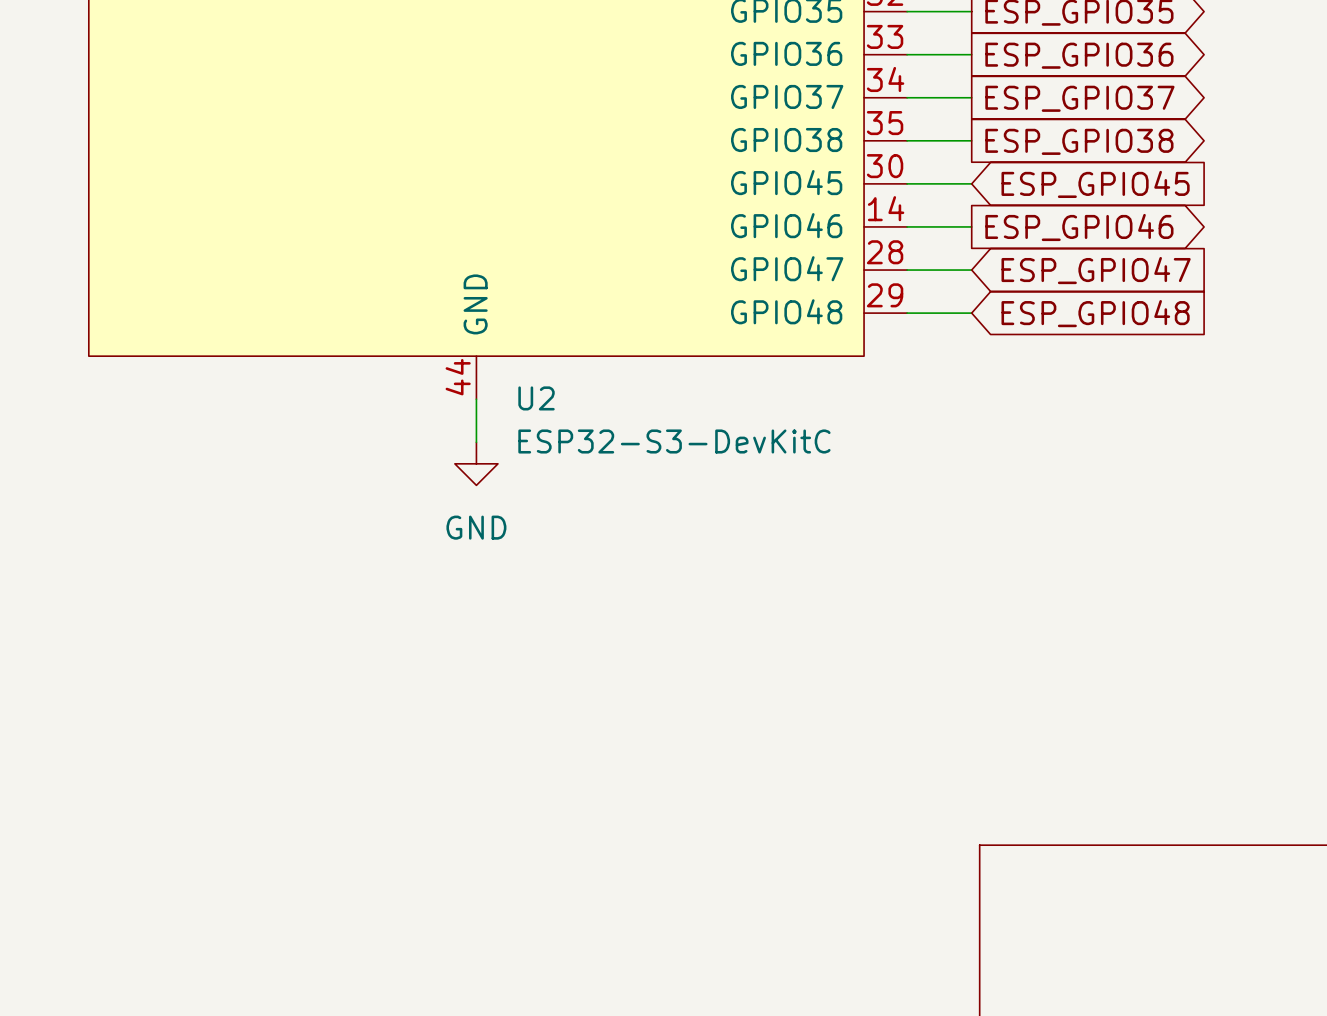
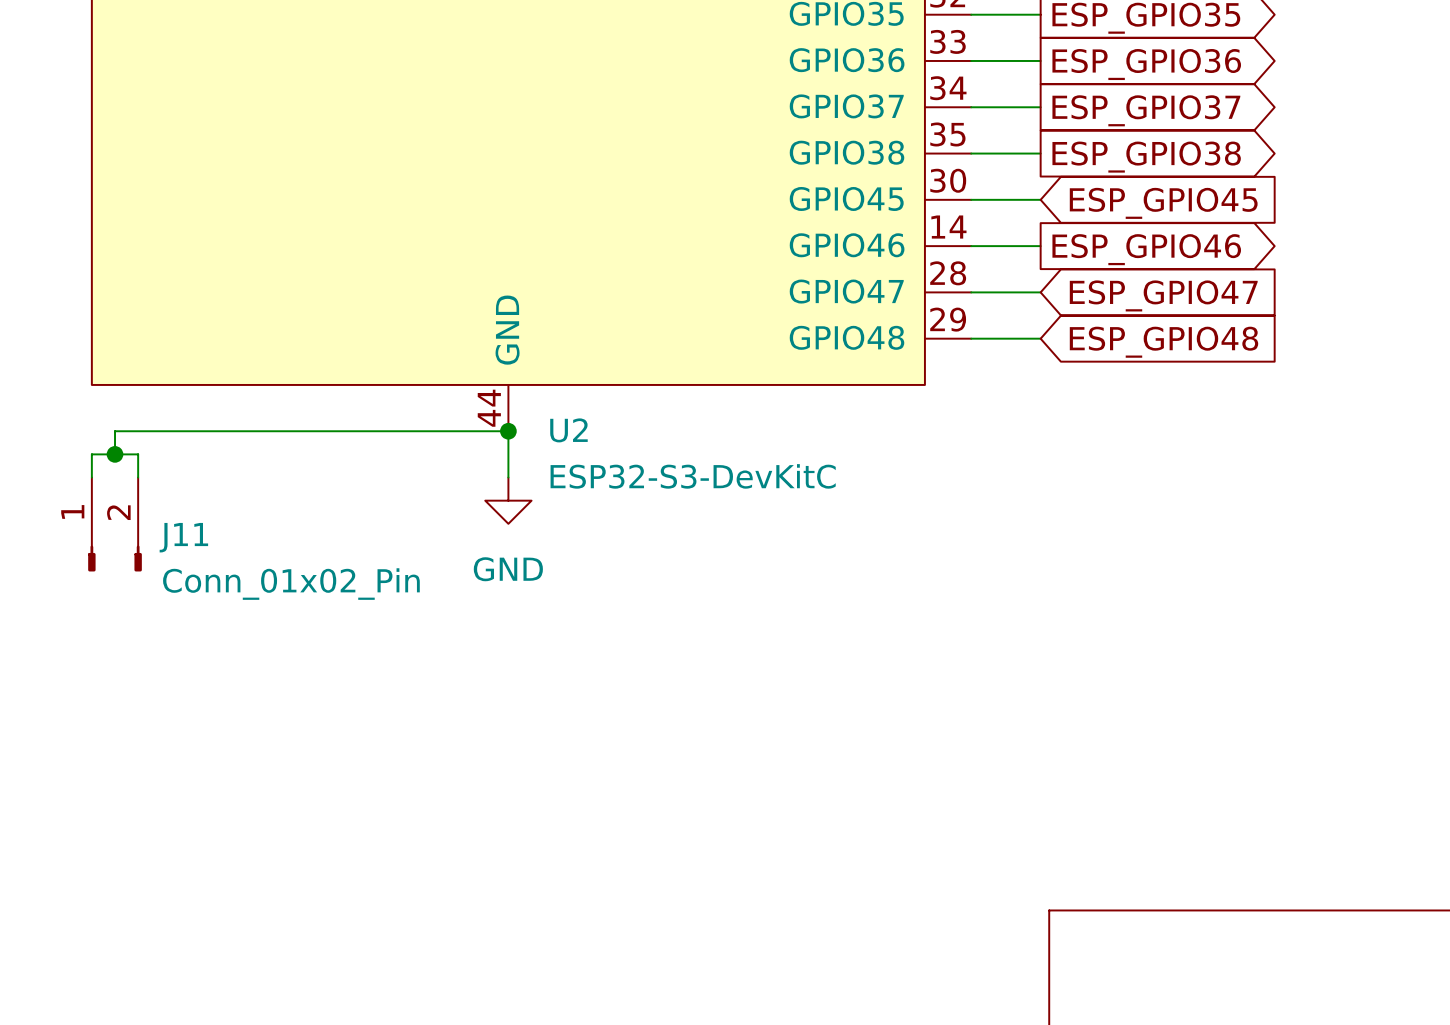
wire: none -> (508, 431) (115, 431) (115, 454)
junction: none -> (508, 431)
junction: none -> (115, 454)
wire: none -> (91, 477) (91, 454) (138, 454) (138, 477)
J11: none -> Conn_01x02_Pin (115, 524)

